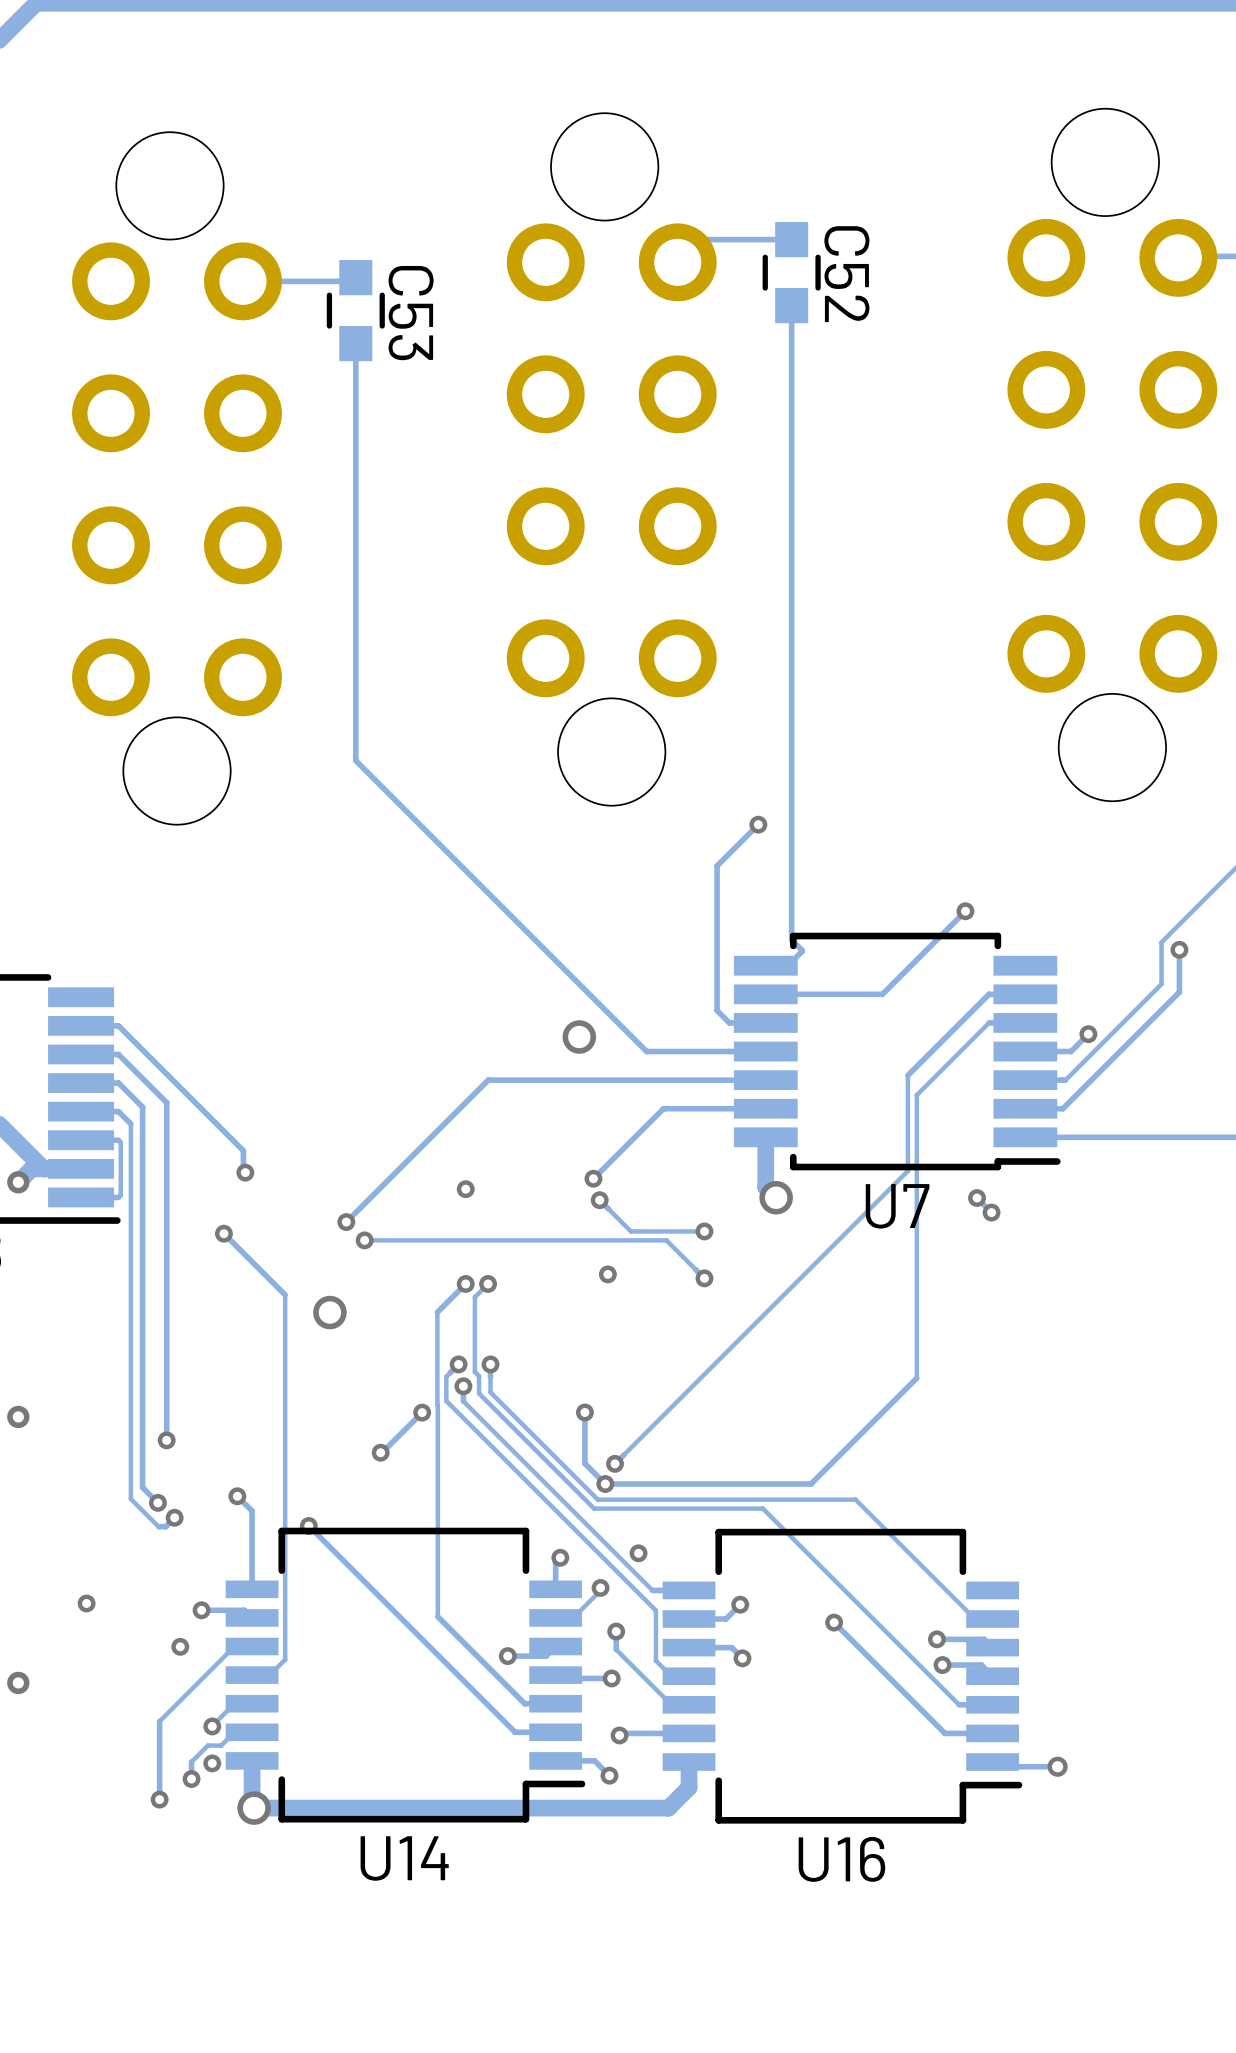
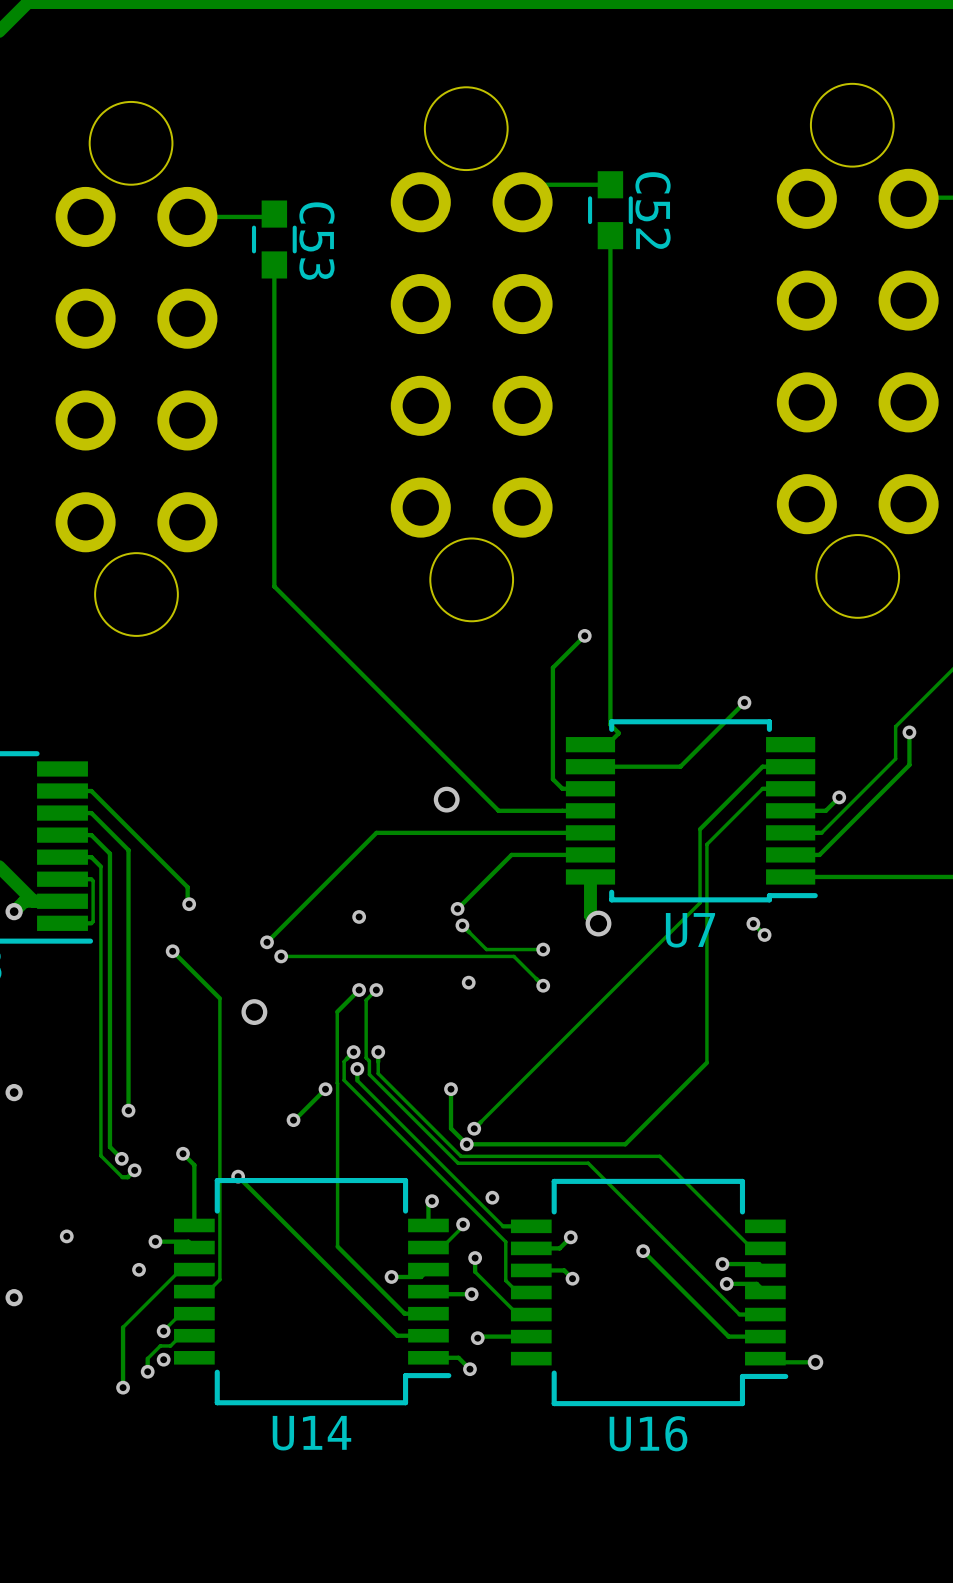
track: (252, 1760) (252, 1806) (254, 1808) (668, 1808) (689, 1787) (689, 1762) -> none
via: (254, 1808) -> none

